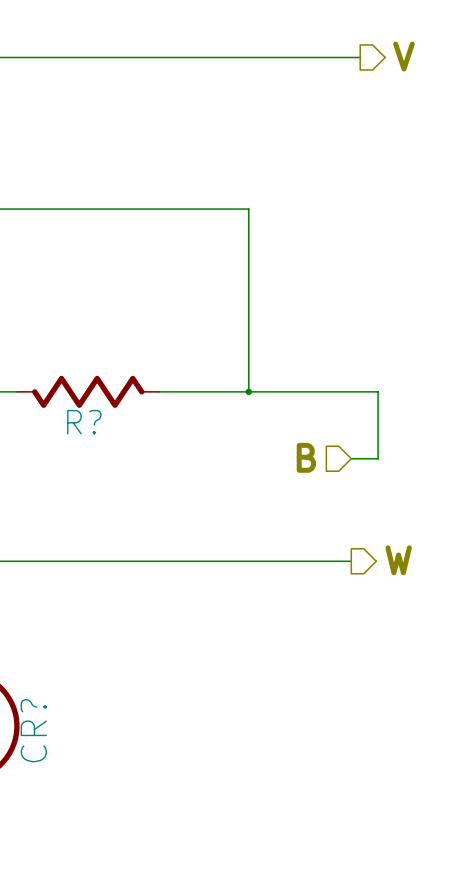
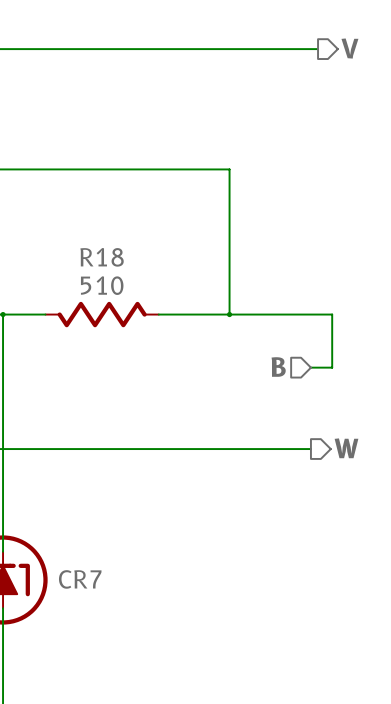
R? text: none -> R18 (102, 257)
R? value: none -> 510 (102, 285)
R? name: R? (84, 422) -> none
CR? text: none -> CR7 (80, 579)
CR? name: CR? (33, 730) -> none

